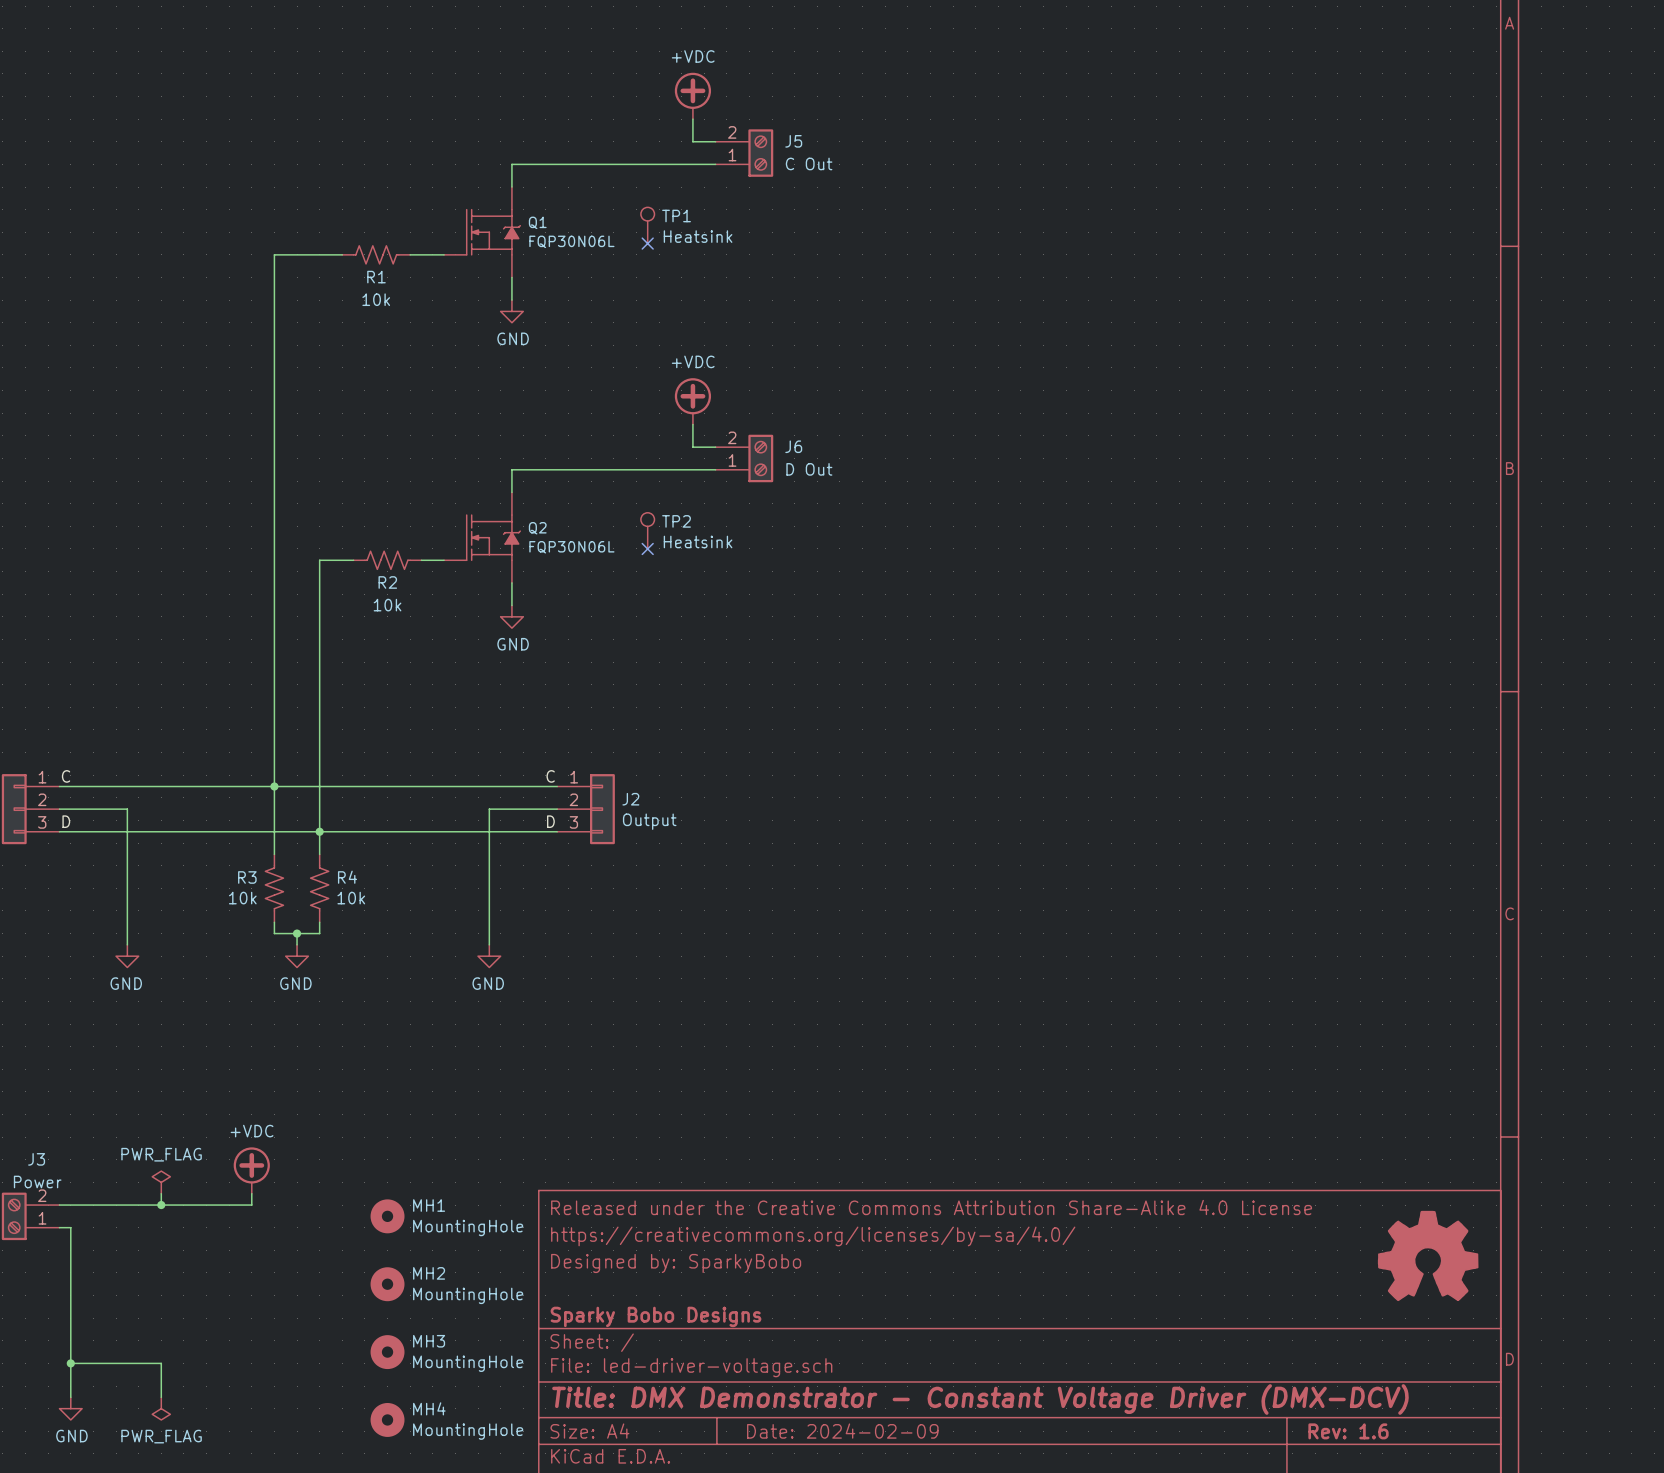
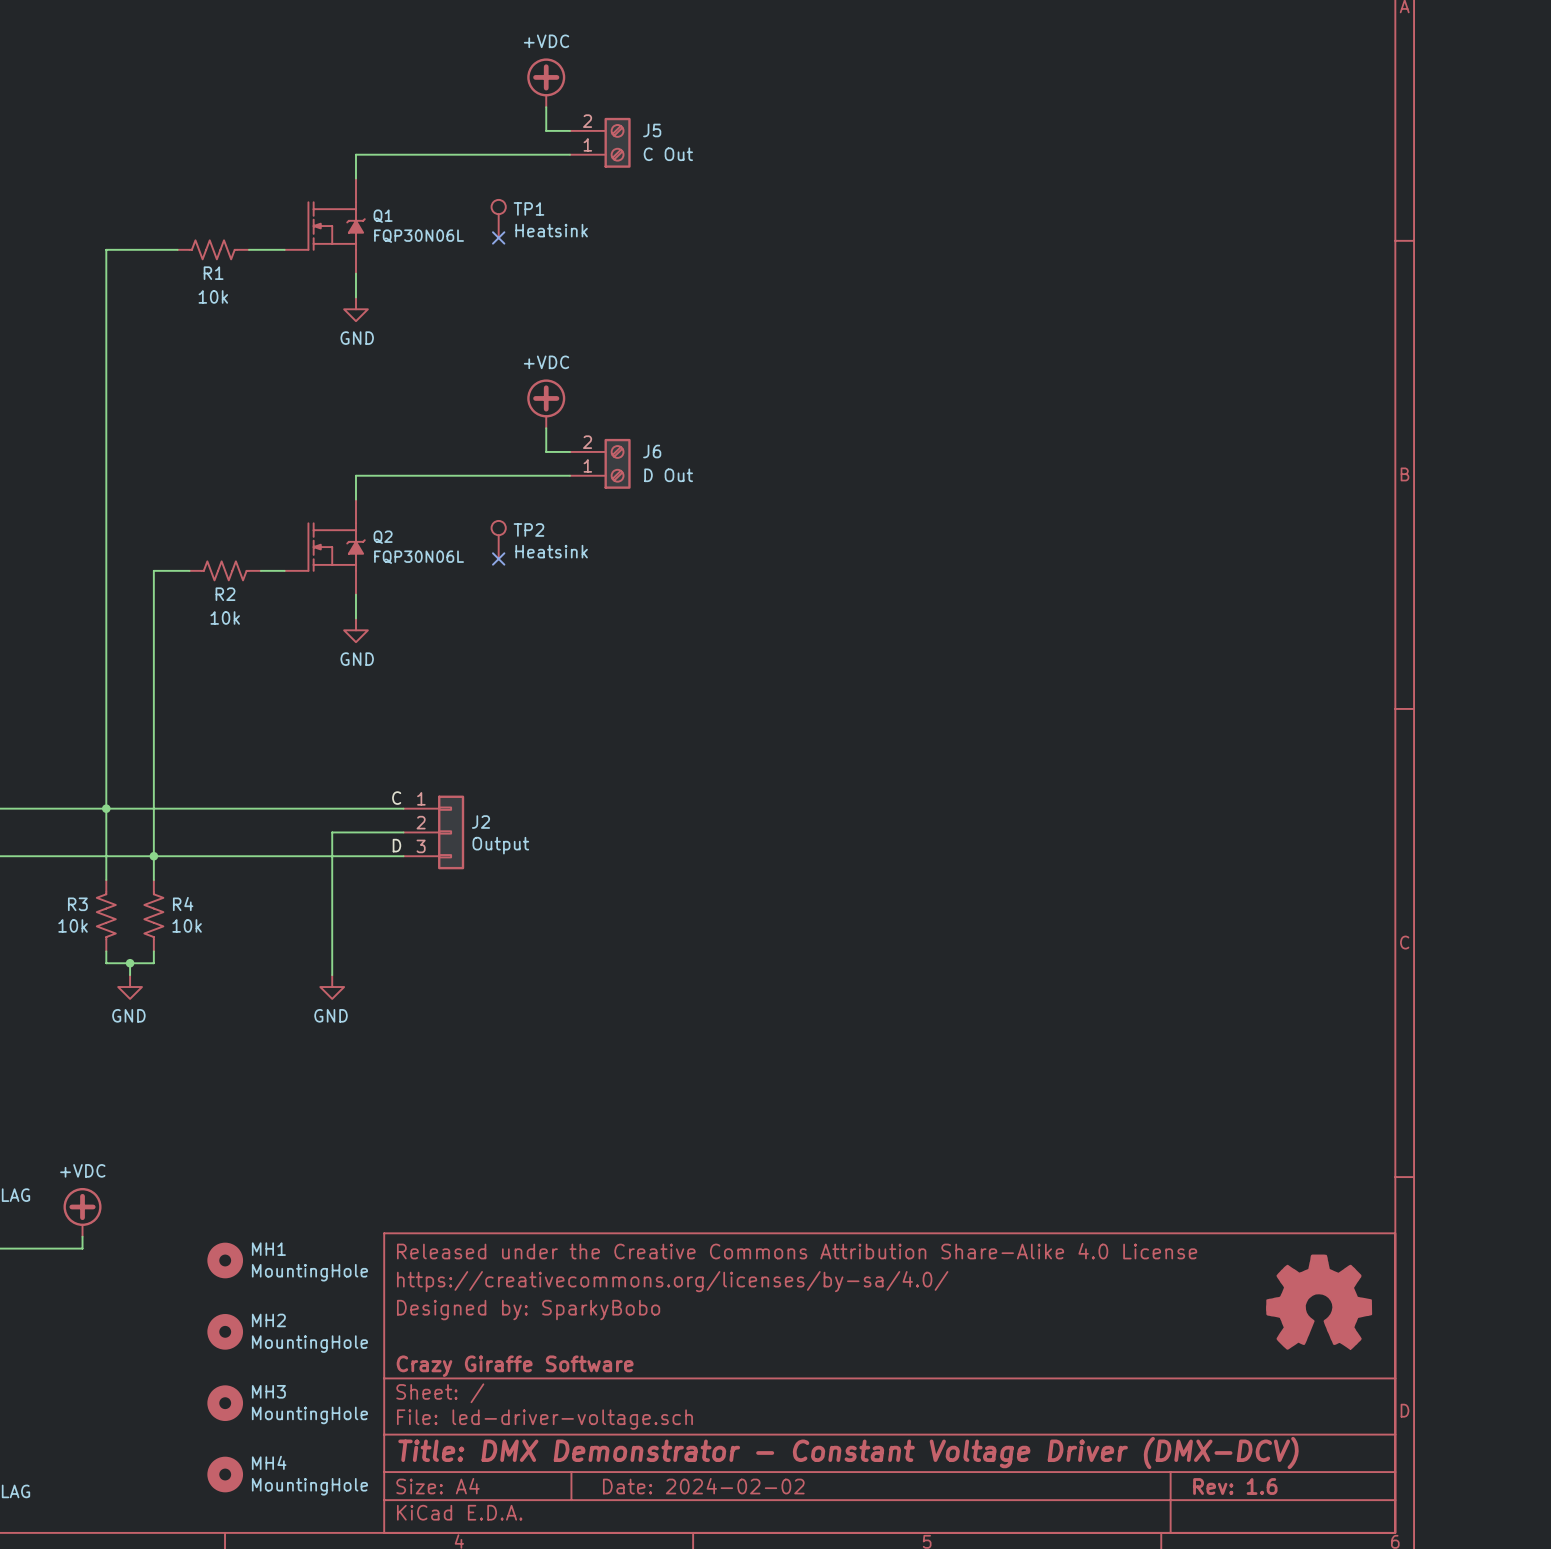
title block: Sparky Bobo Designs (656, 1316) -> Crazy Giraffe Software (515, 1366)
title block: Date: 2024-02-09 (842, 1431) -> Date: 2024-02-02 (703, 1486)

